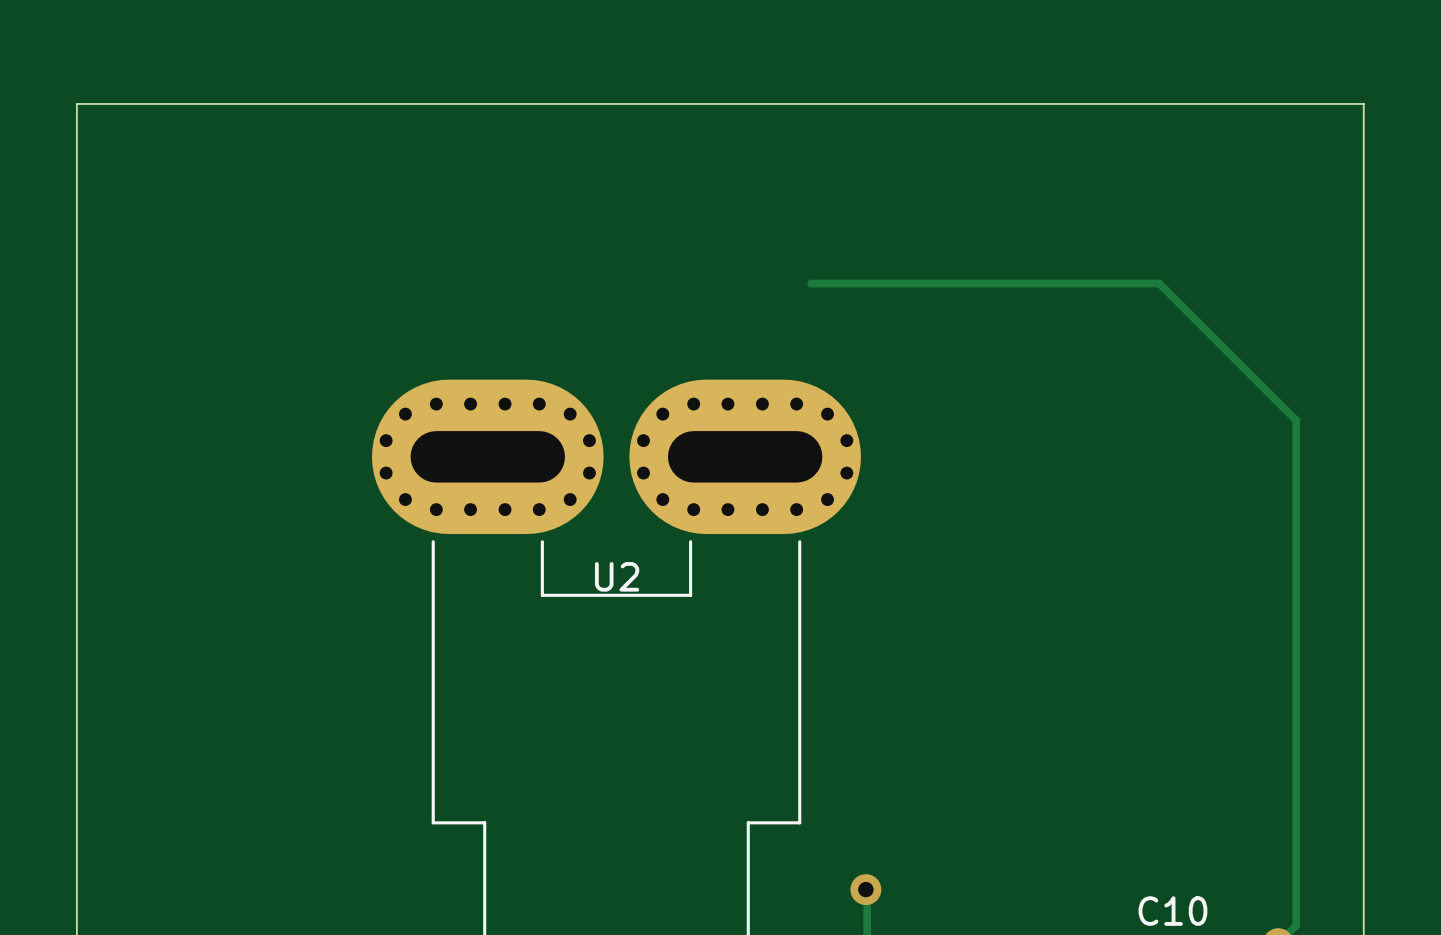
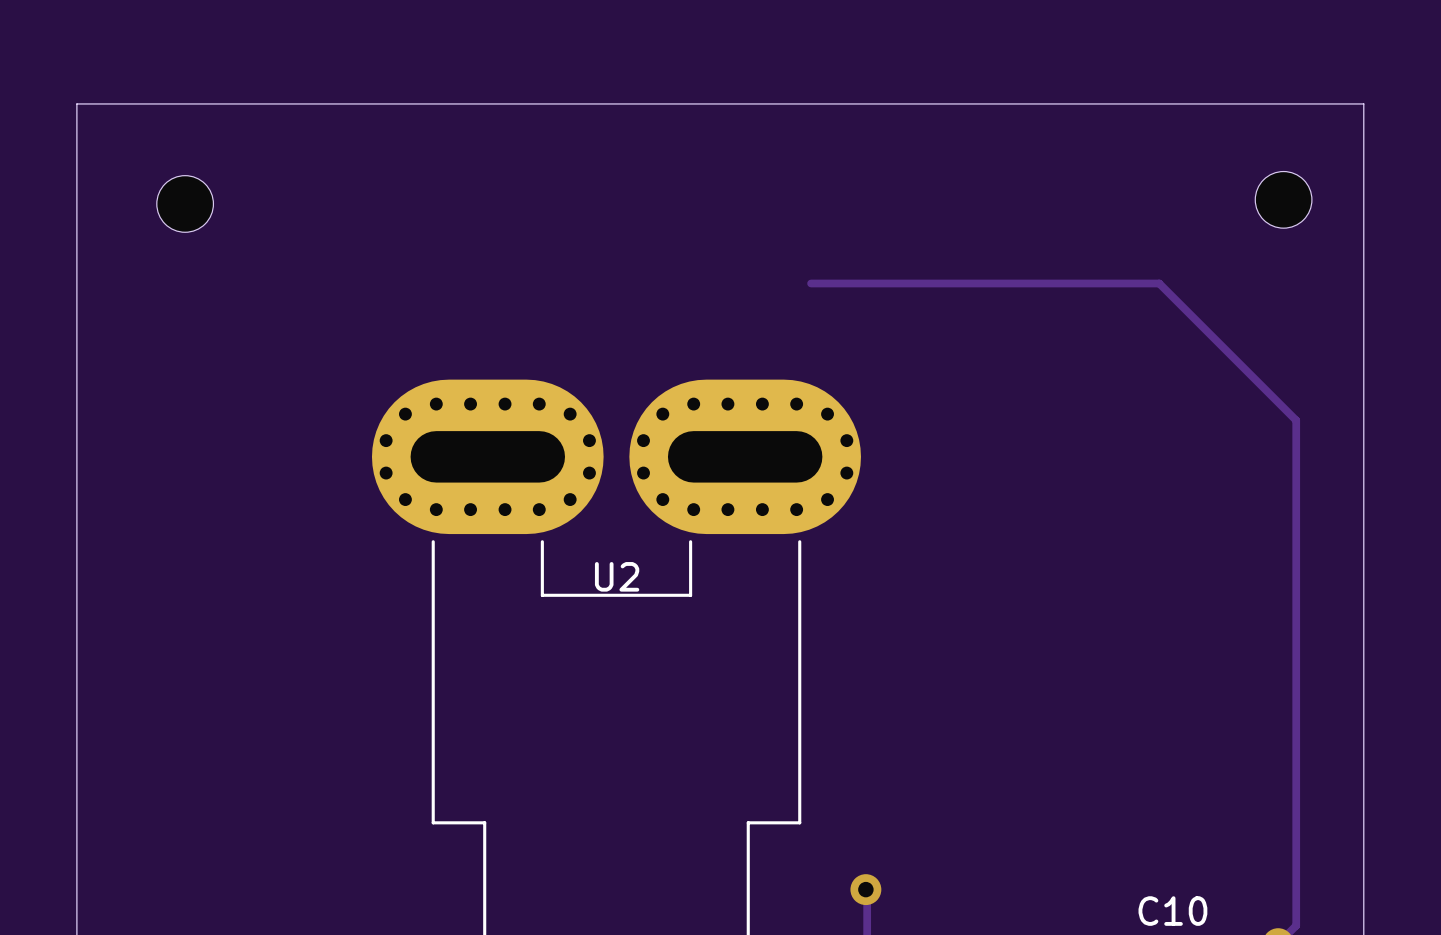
part: none -> (1283, 199)
part: none -> (185, 203)

